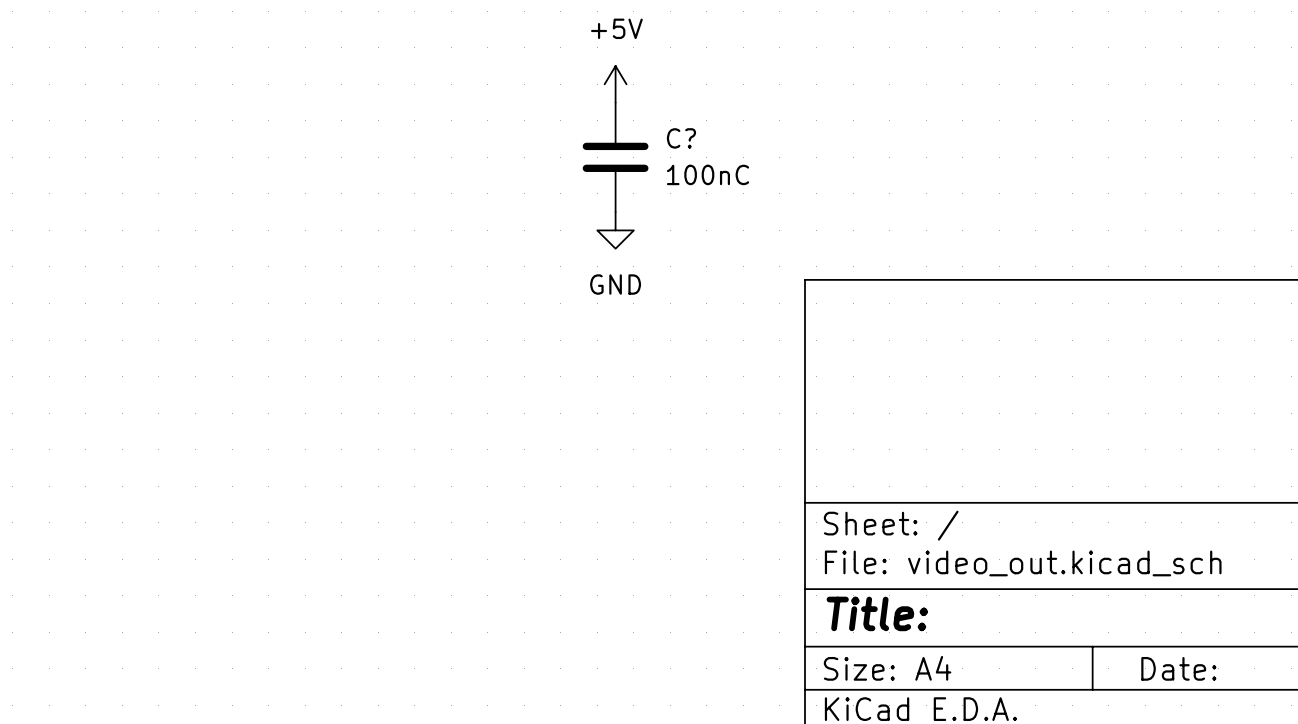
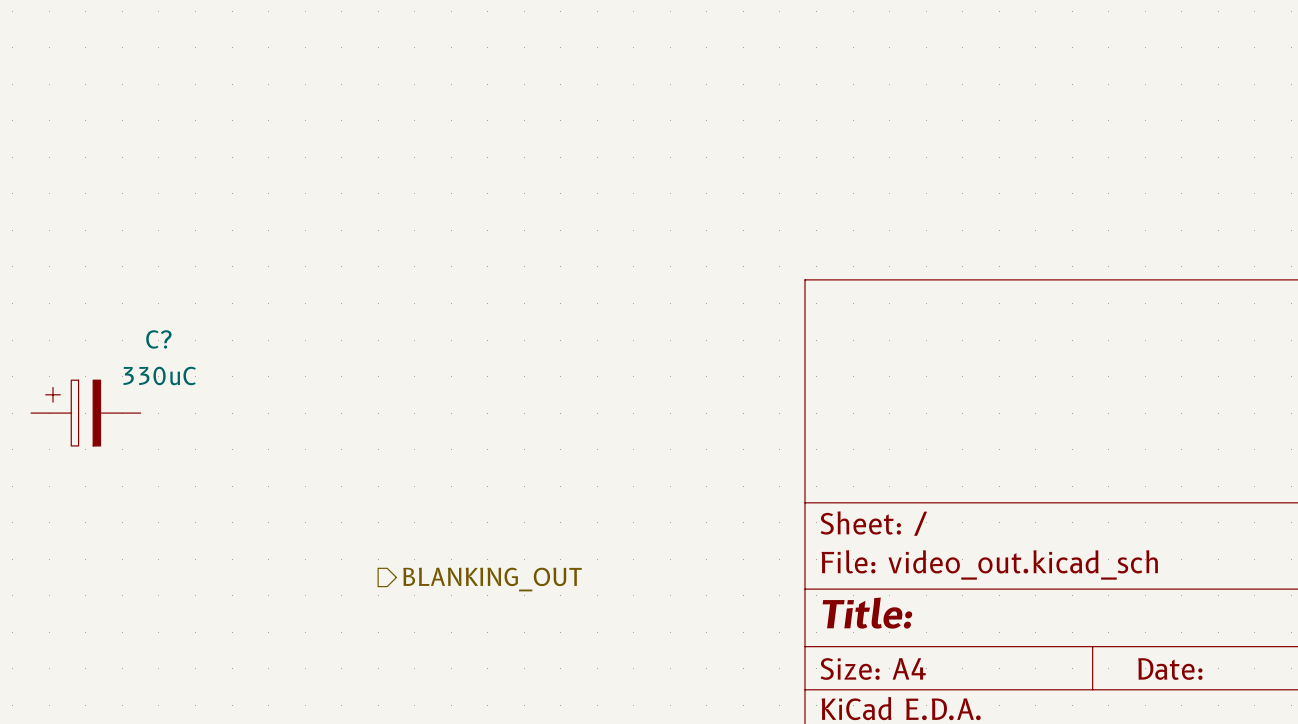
power symbol: +5V (615, 84) -> none
C?: 100nC (615, 157) -> none
power symbol: GND (615, 230) -> none
C?: none -> 330uC (85, 413)
hierarchical label: none -> BLANKING_OUT (492, 579)

